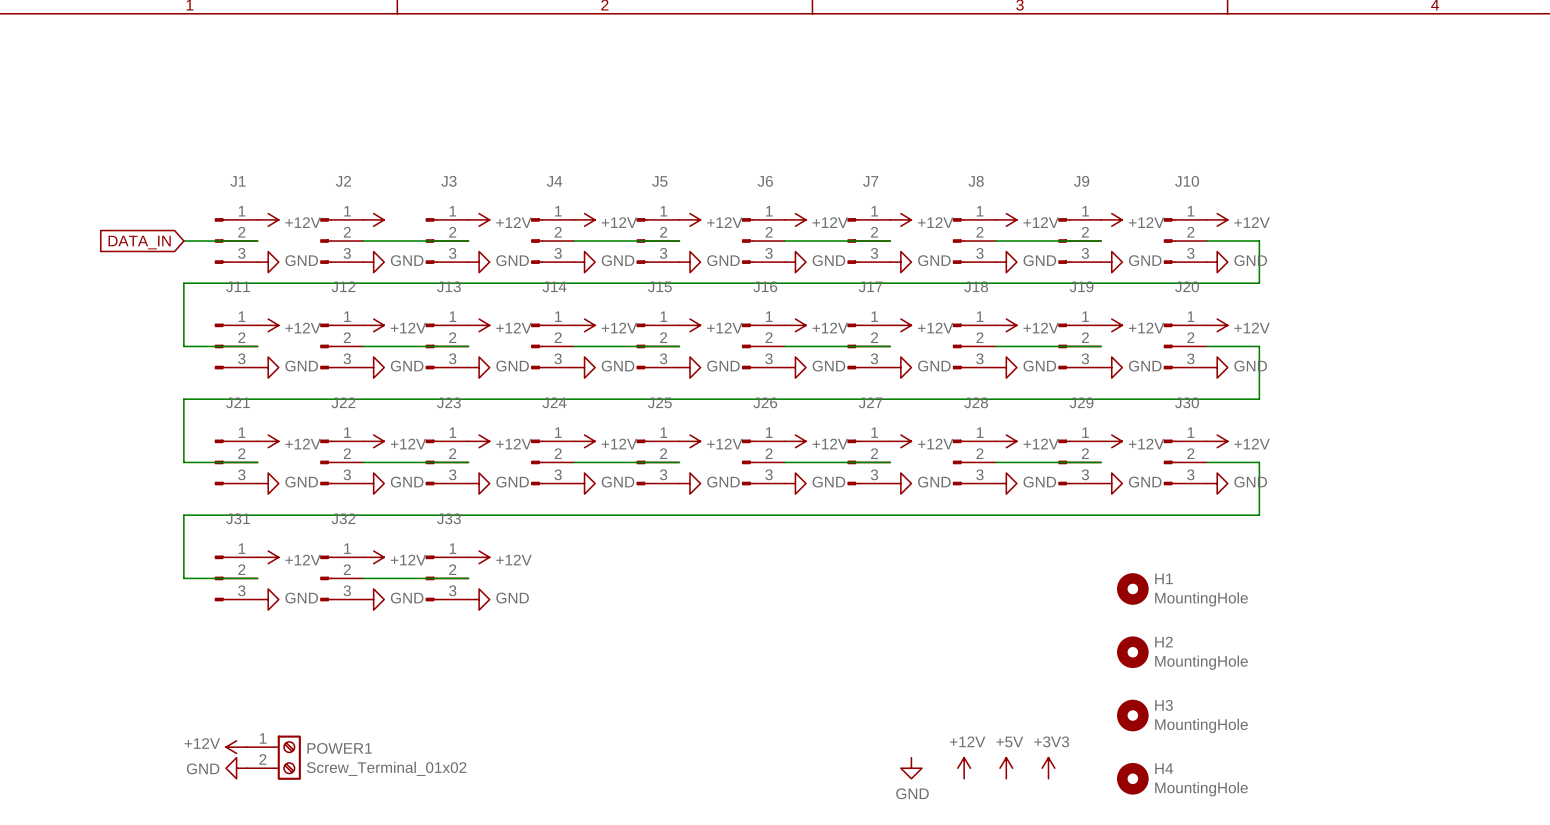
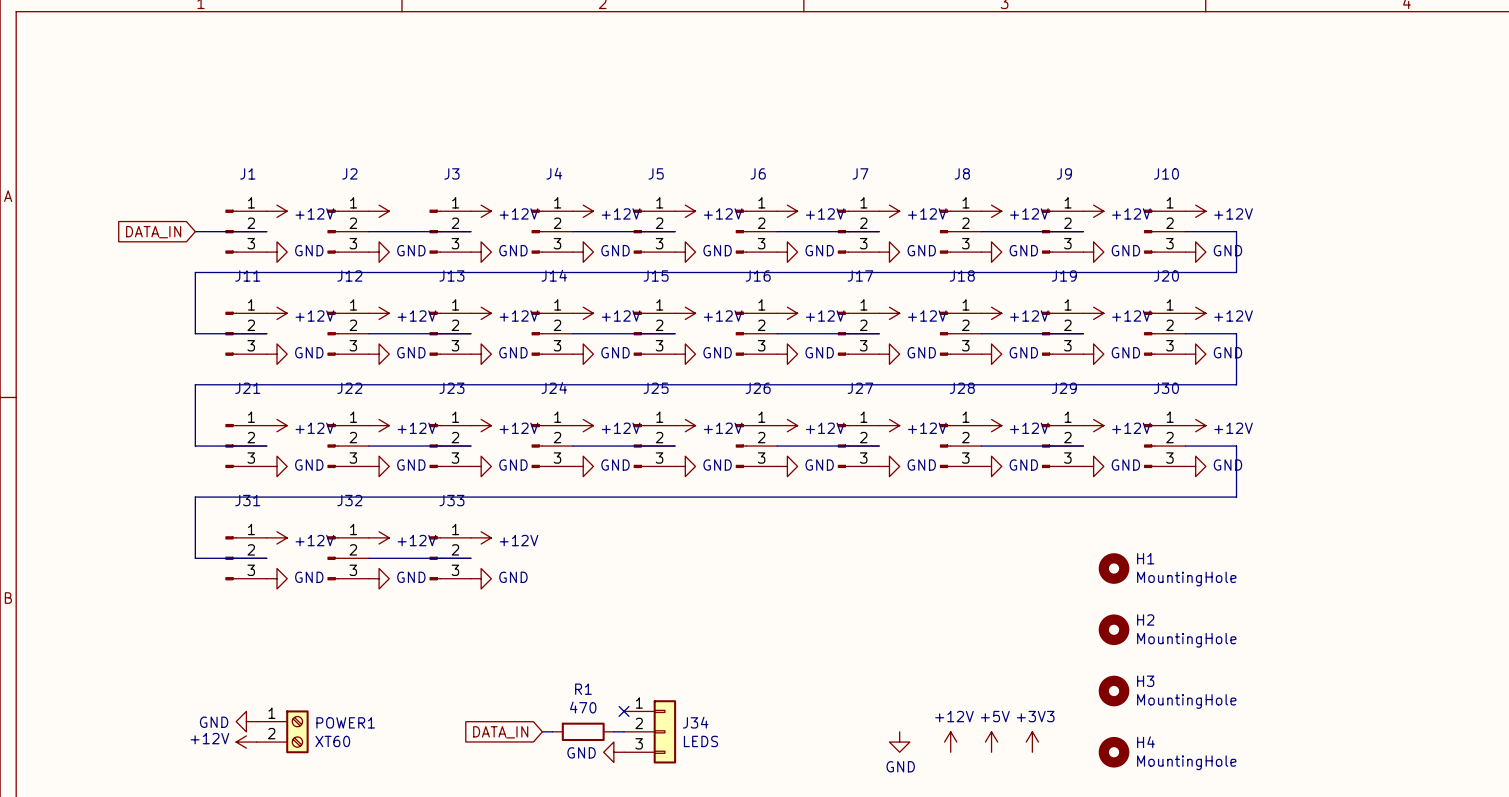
no-connect mark: none -> (624, 711)
power symbol: +12V (236, 747) -> GND (246, 721)
wire: none -> (542, 731) (552, 731)
R1: none -> 470 (583, 731)
wire: none -> (613, 731) (624, 731)
J34: none -> LEDS (650, 731)
global label: none -> DATA_IN (500, 732)
power symbol: GND (236, 768) -> +12V (246, 742)
POWER1 value: Screw_Terminal_01x02 (386, 768) -> XT60 (332, 741)
power symbol: none -> GND (613, 752)

